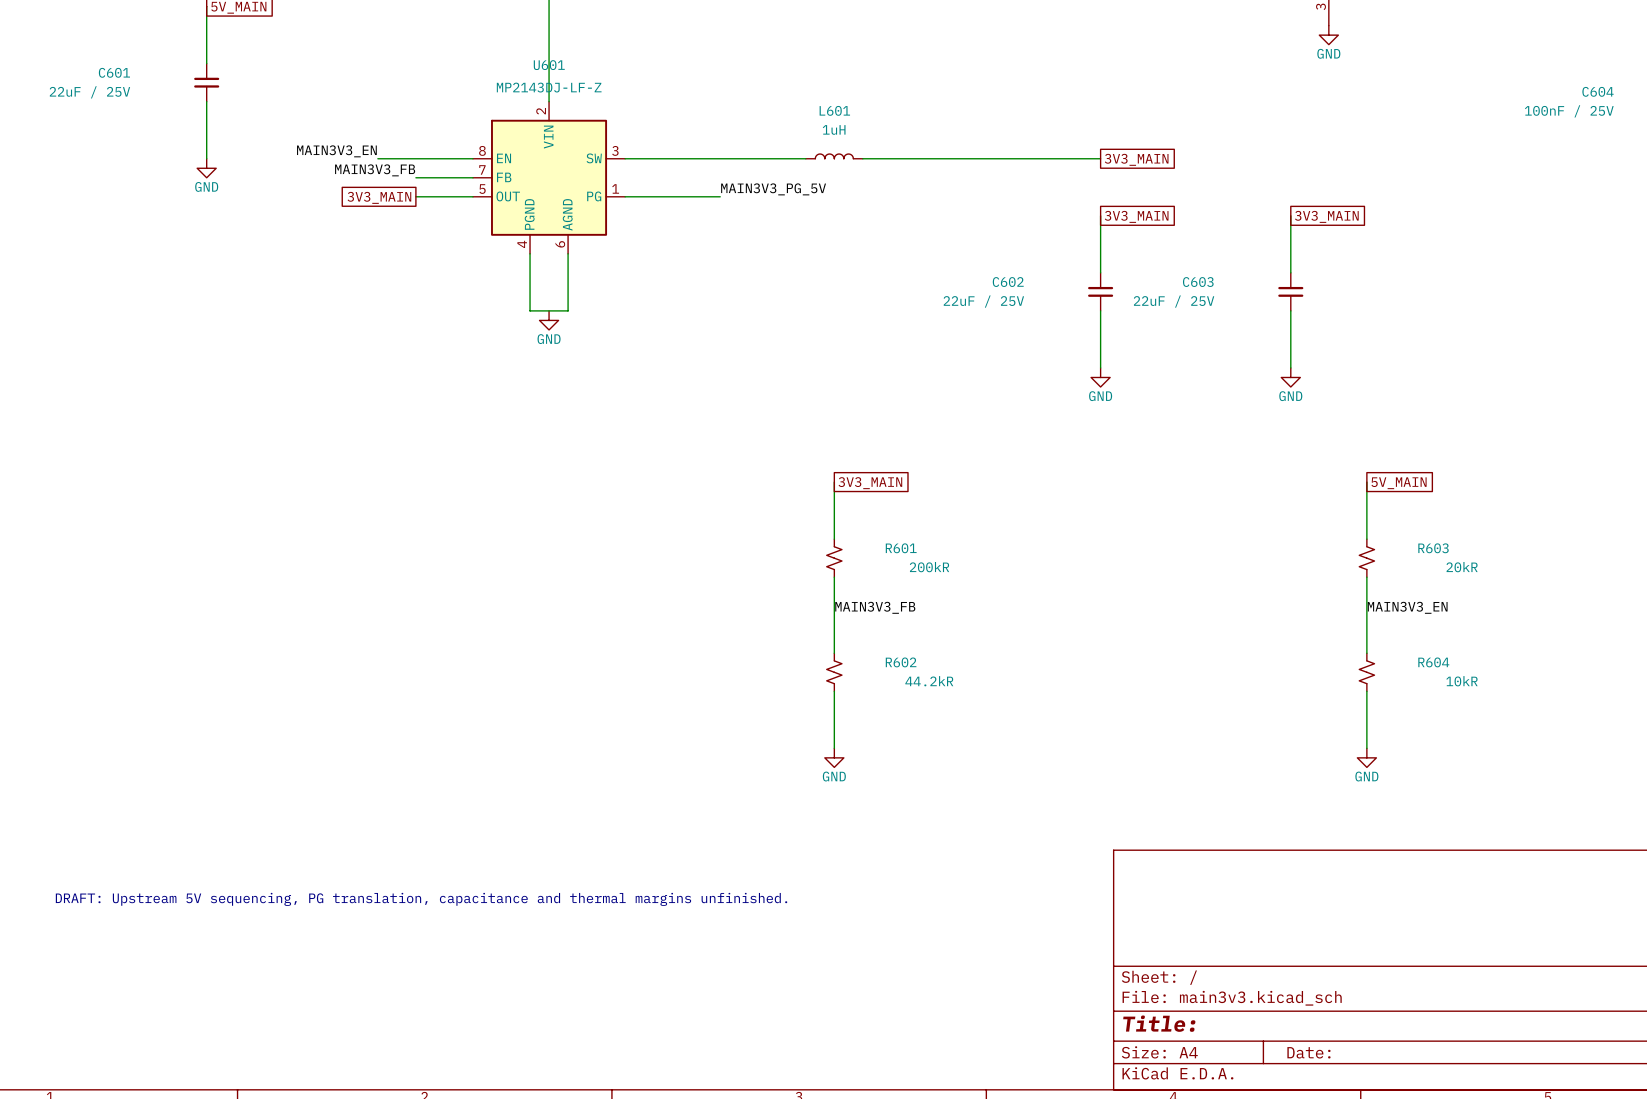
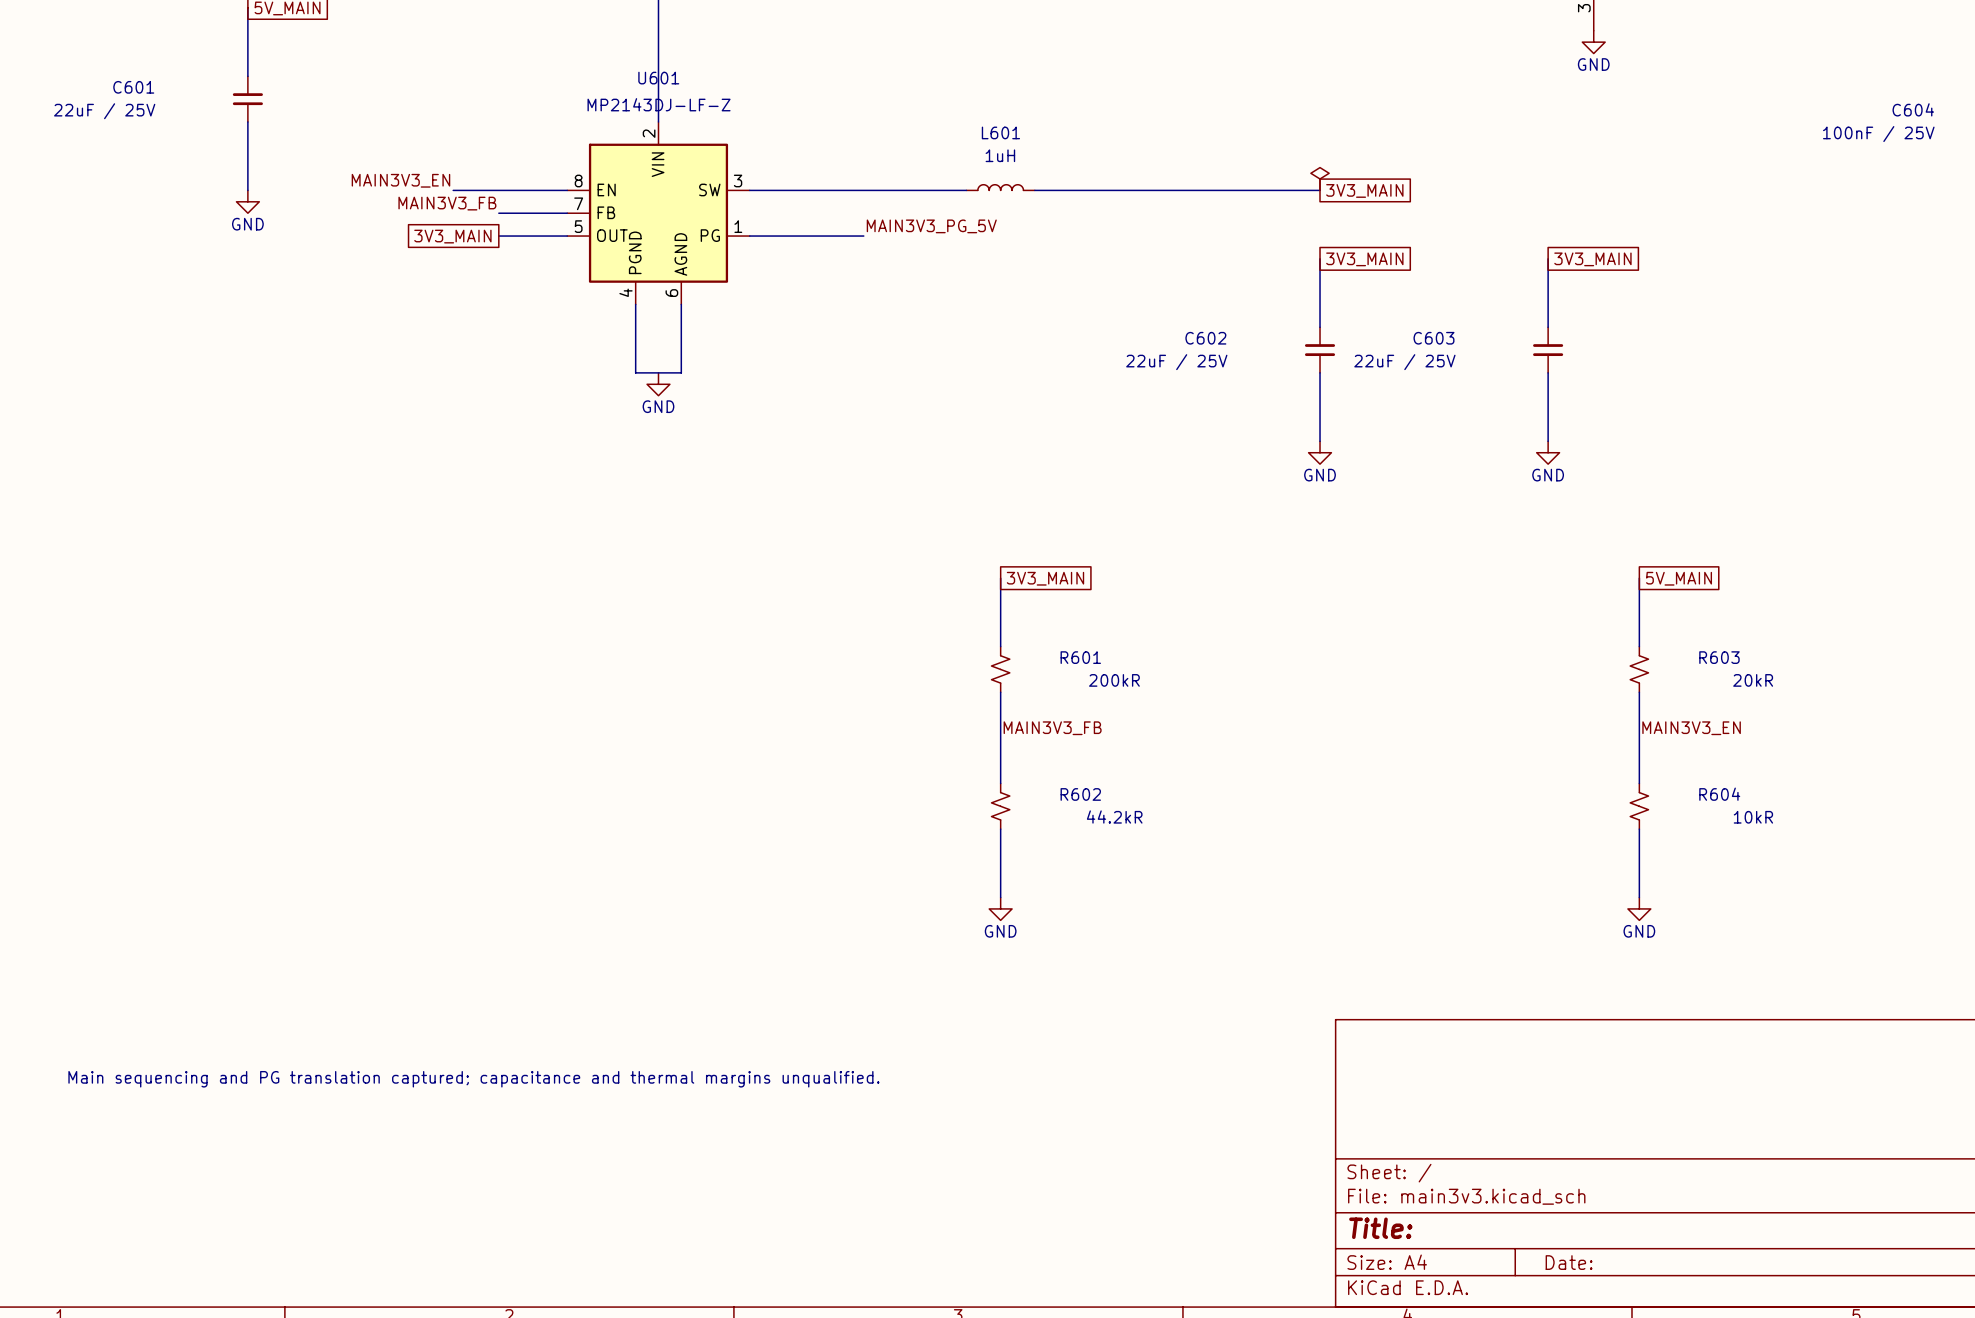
power symbol: none -> (1320, 179)
text: DRAFT: Upstream 5V sequencing, PG translation, capacitance and thermal margins unfinished. (421, 899) -> Main sequencing and PG translation captured; capacitance and thermal margins unqualified. (473, 1079)

